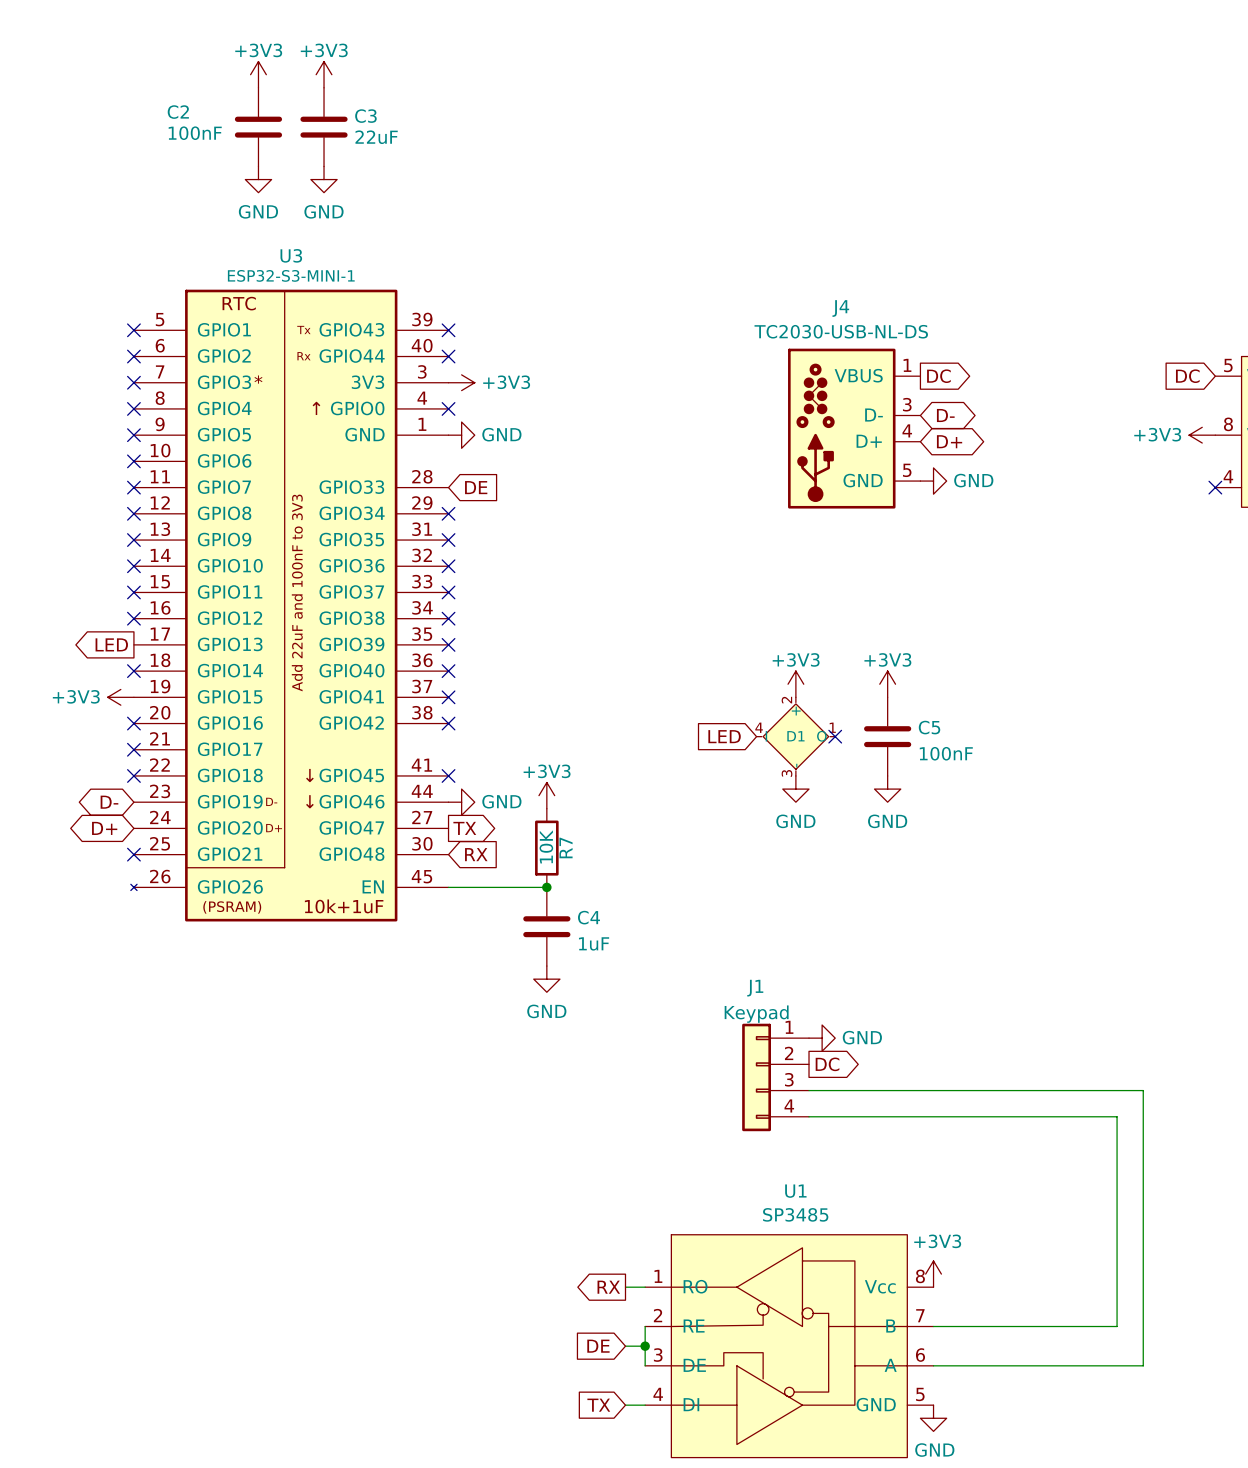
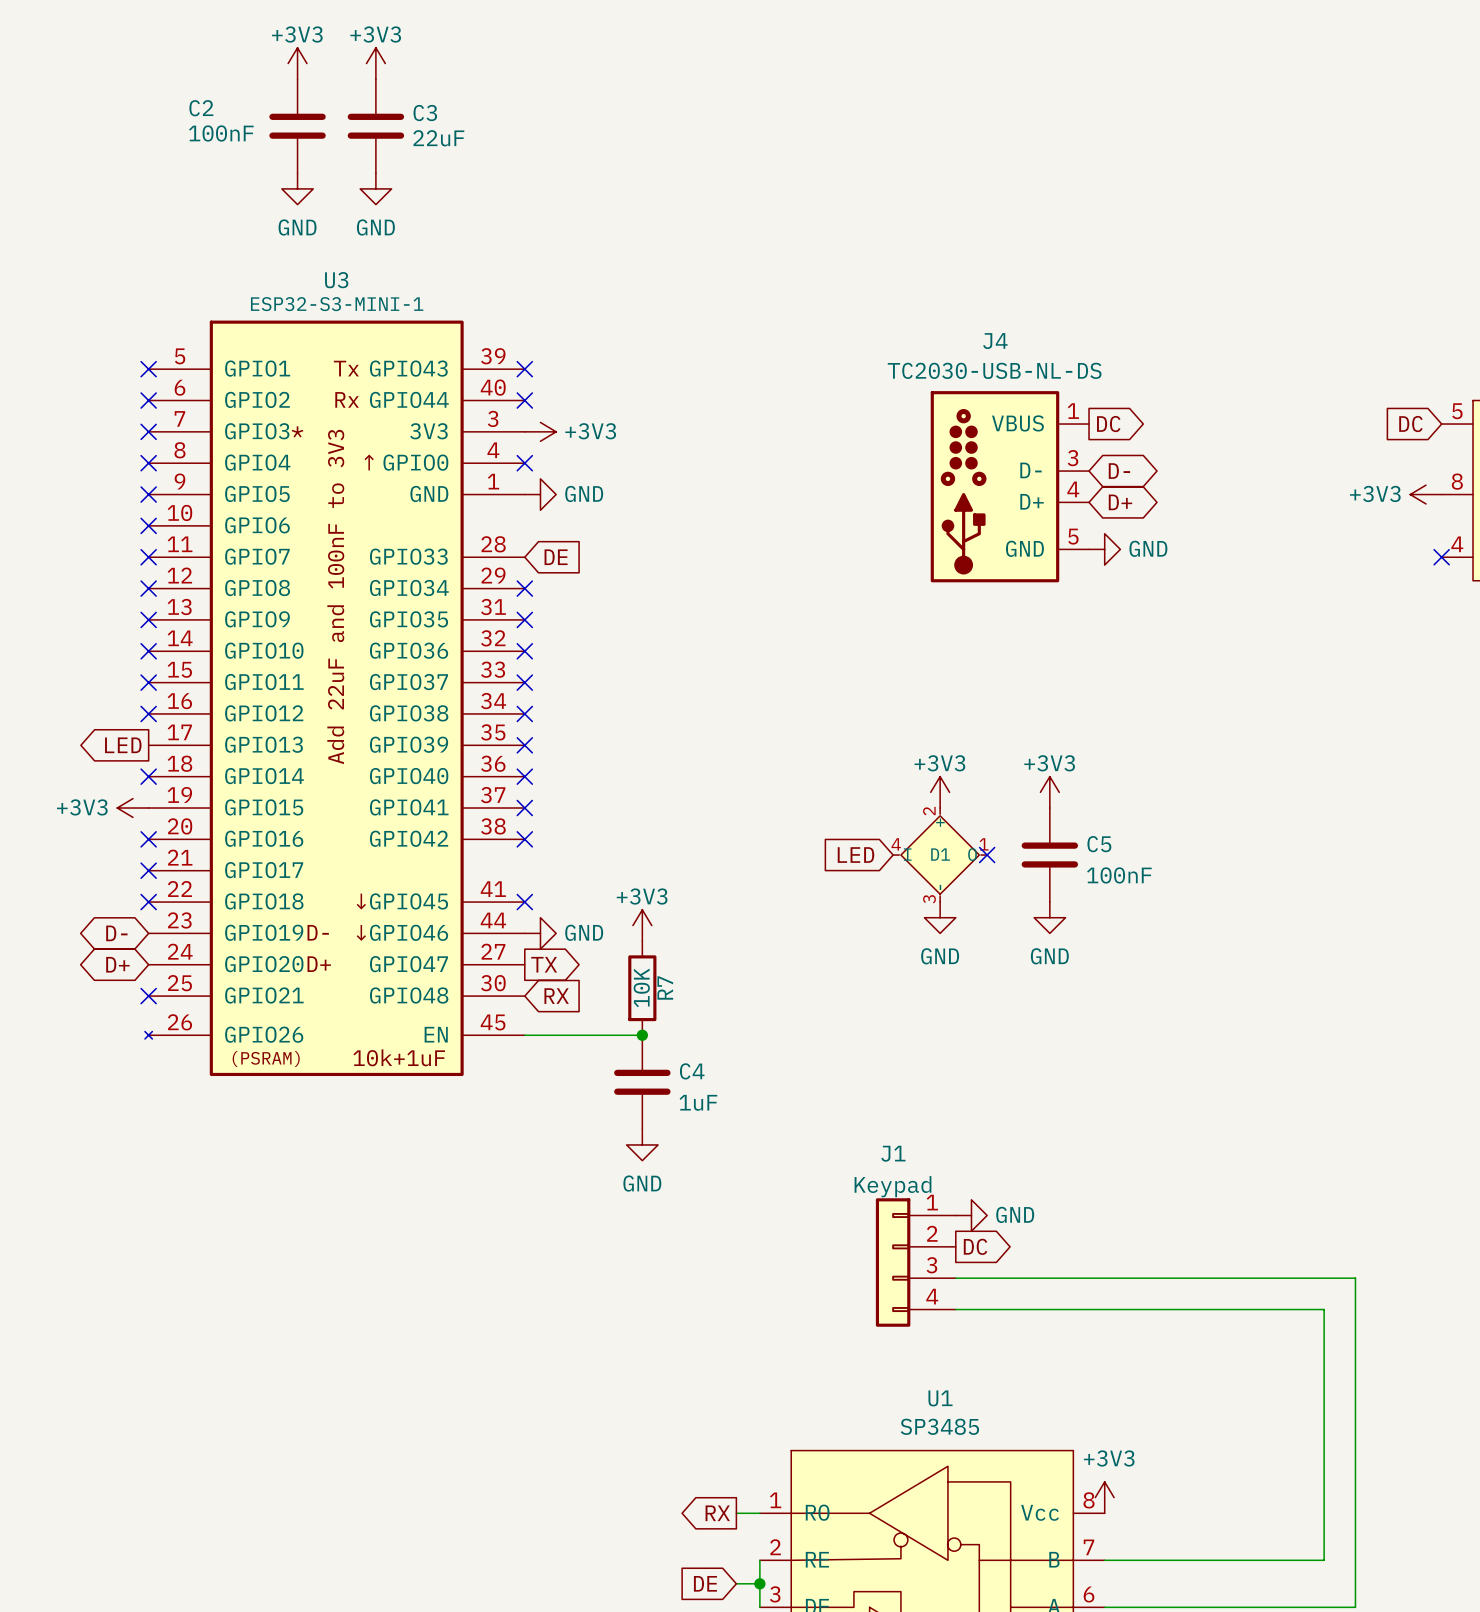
U3 symbol: [130, 289, 449, 922] -> [144, 320, 525, 1077]
J4 symbol: [788, 348, 921, 509] -> [930, 391, 1090, 583]

